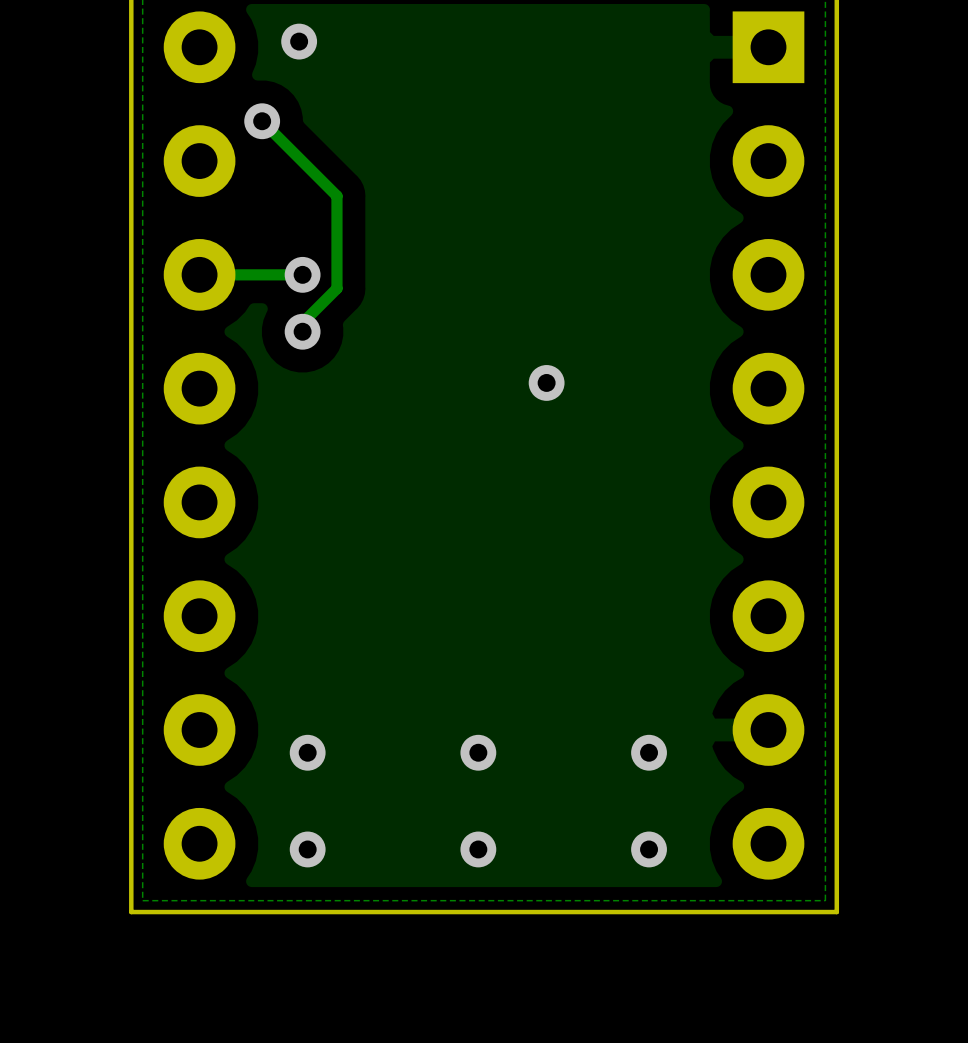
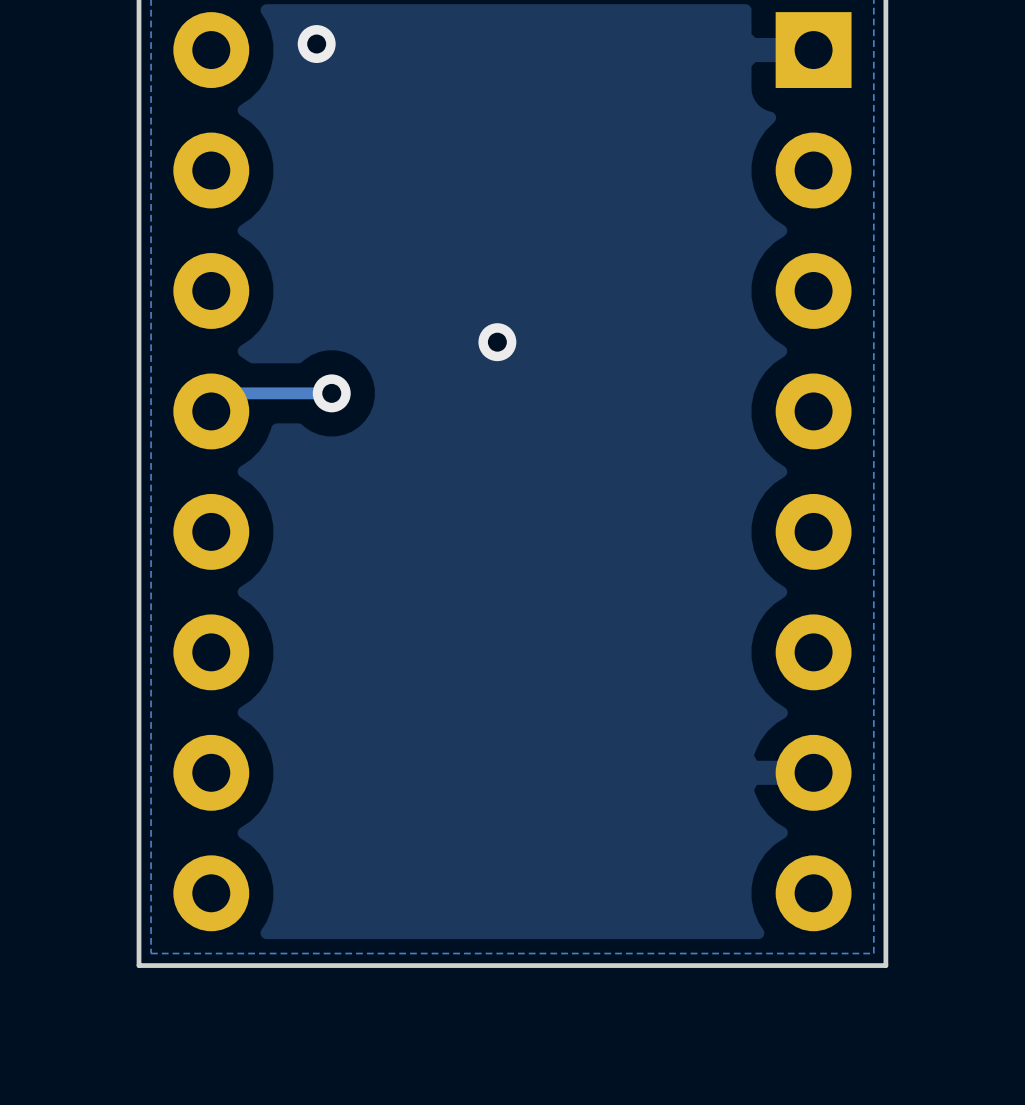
track: (262, 121) (336, 196) (336, 288) (302, 322) (302, 331) -> none
via: (262, 121) -> none
track: (302, 274) (199, 274) -> none
via: (302, 274) -> none
via: none -> (497, 342)
via position: (302, 331) -> (331, 393)
track: none -> (331, 393) (229, 393)
via: (546, 382) -> none
via: (307, 752) -> none
via: (478, 752) -> none
via: (649, 752) -> none
via: (307, 849) -> none
via: (478, 849) -> none
via: (649, 849) -> none

